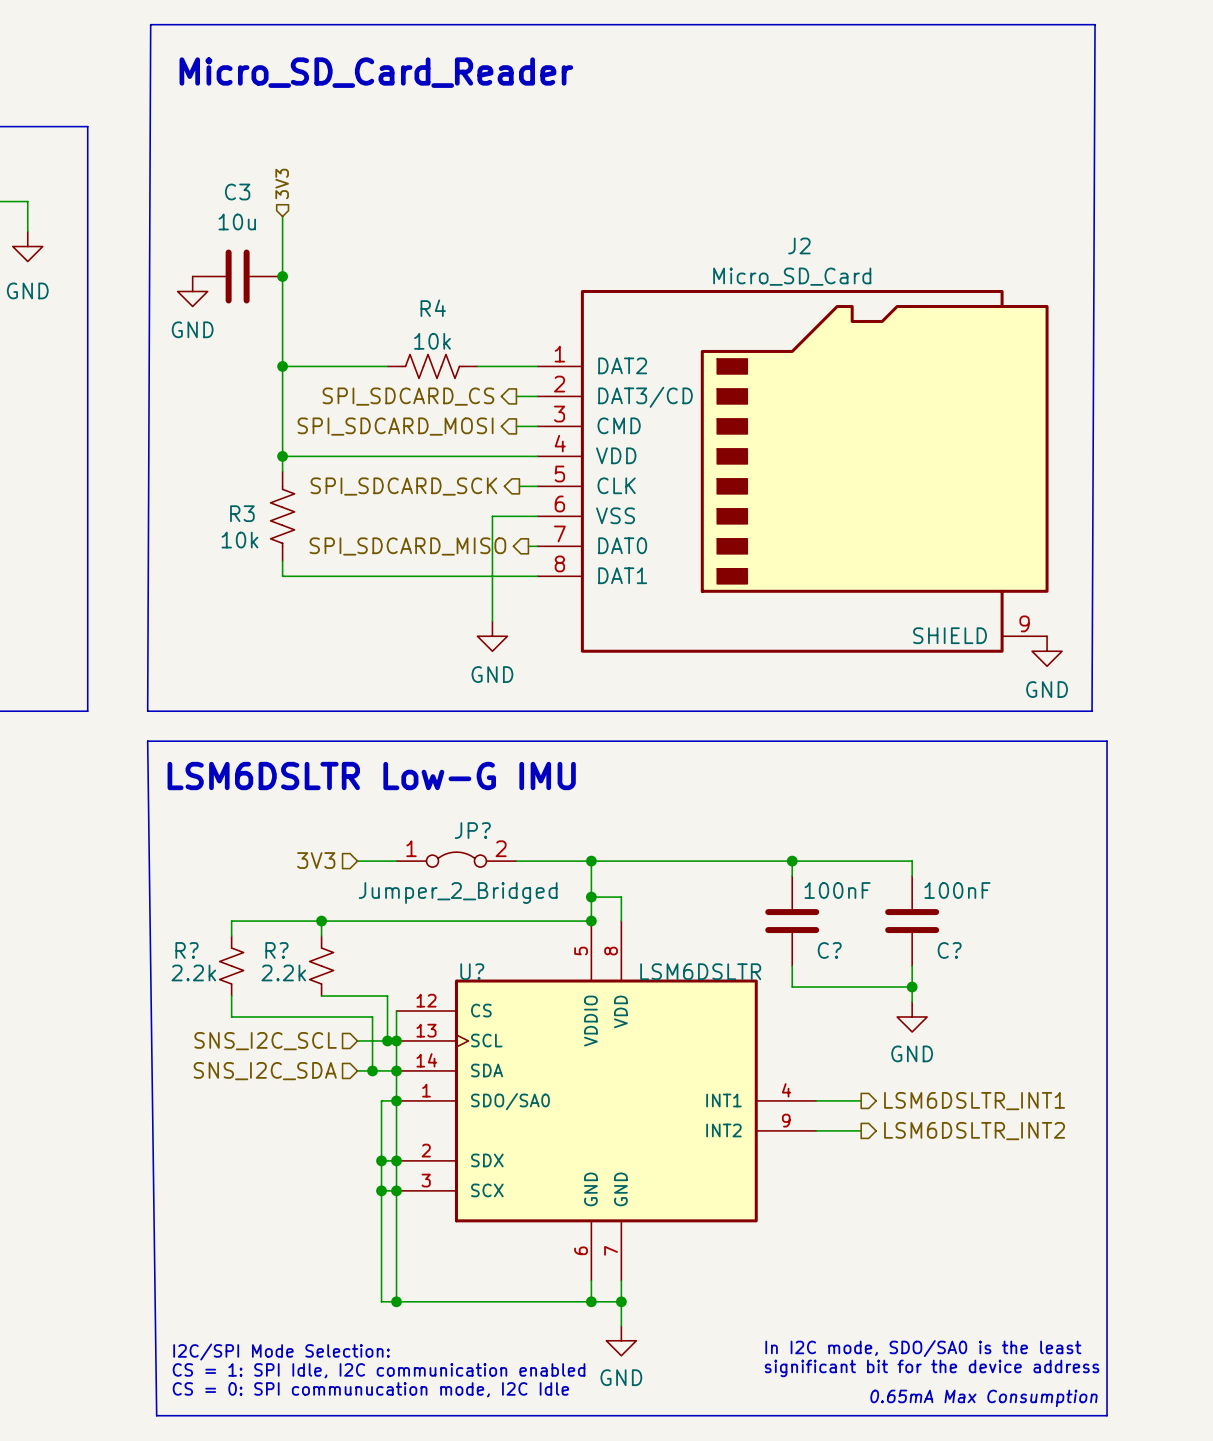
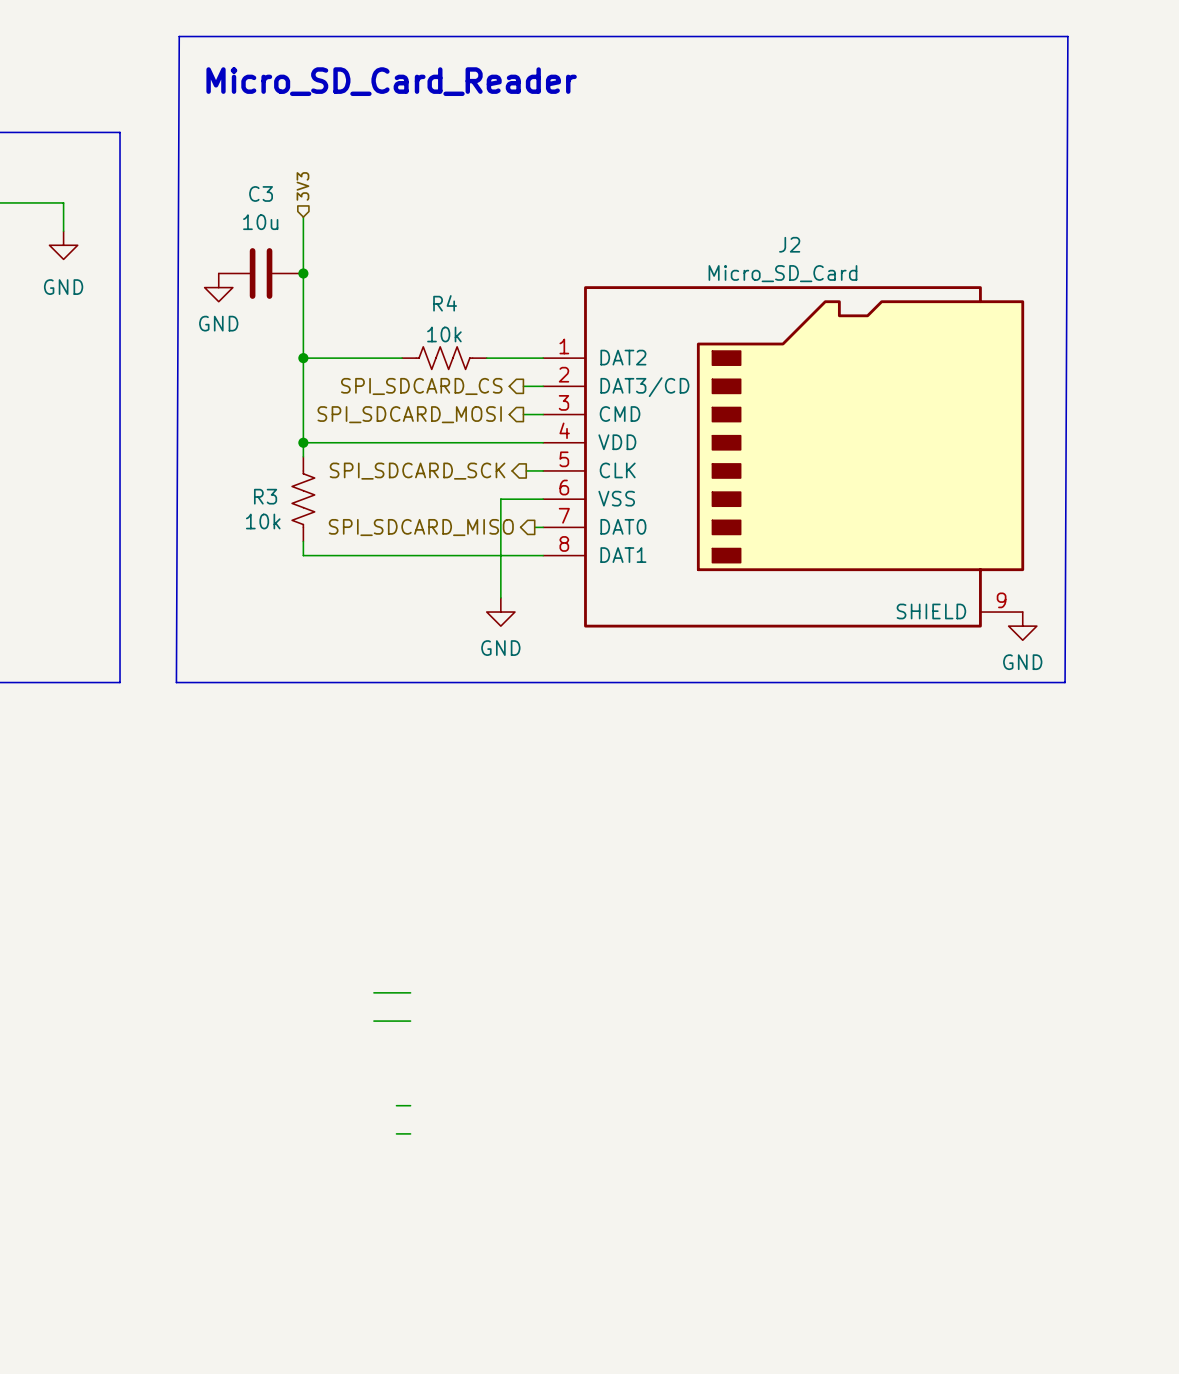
line: (147, 741) (1107, 741) (1107, 1415) (156, 1415) (147, 741) -> none
text: LSM6DSLTR Low-G IMU (371, 776) -> none
JP?: Jumper_2_Bridged (456, 859) -> none
hierarchical label: 3V3 (316, 860) -> none
wire: (357, 861) (396, 861) -> none
wire: (516, 861) (912, 861) (912, 876) -> none
wire: (591, 861) (591, 921) (231, 921) (231, 936) -> none
junction: (591, 861) -> none
wire: (792, 861) (792, 876) -> none
junction: (792, 861) -> none
wire: (591, 897) (621, 897) (621, 921) -> none
junction: (591, 897) -> none
wire: (321, 921) (321, 936) -> none
junction: (321, 921) -> none
junction: (591, 921) -> none
C?: 100nF (792, 921) -> none
C?: 100nF (912, 921) -> none
R?: 2.2k (231, 966) -> none
R?: 2.2k (321, 966) -> none
wire: (792, 966) (792, 987) (912, 987) -> none
wire: (912, 966) (912, 1002) -> none
junction: (912, 987) -> none
wire: (231, 996) (231, 1016) (372, 1016) (372, 1070) -> none
wire: (321, 996) (387, 996) (387, 1040) -> none
wire: (396, 1011) (396, 1301) -> none
power symbol: GND (912, 1016) -> none
junction: (387, 1040) -> none
junction: (396, 1040) -> none
hierarchical label: SNS_I2C_SCL (265, 1041) -> none
junction: (372, 1070) -> none
junction: (396, 1070) -> none
hierarchical label: SNS_I2C_SDA (265, 1071) -> none
wire: (396, 1100) (381, 1100) (381, 1301) (621, 1301) -> none
junction: (396, 1100) -> none
U?: LSM6DSLTR (606, 1100) -> none
wire: (816, 1100) (861, 1100) -> none
hierarchical label: LSM6DSLTR_INT1 (974, 1101) -> none
wire: (816, 1130) (861, 1130) -> none
hierarchical label: LSM6DSLTR_INT2 (974, 1131) -> none
junction: (381, 1160) -> none
junction: (396, 1160) -> none
junction: (381, 1190) -> none
junction: (396, 1190) -> none
wire: (591, 1280) (591, 1301) -> none
wire: (621, 1280) (621, 1325) -> none
junction: (396, 1301) -> none
junction: (591, 1301) -> none
junction: (621, 1301) -> none
power symbol: GND (621, 1340) -> none
text: In I2C mode, SDO/SA0 is the least (923, 1348) -> none
text: I2C/SPI Mode Selection: (281, 1352) -> none
text: significant bit for the device address (932, 1368) -> none
text: CS = 1: SPI Idle, I2C communication enabled (379, 1370) -> none
text: CS = 0: SPI communucation mode, I2C Idle (370, 1389) -> none
text: 0.65mA Max Consumption (983, 1398) -> none

